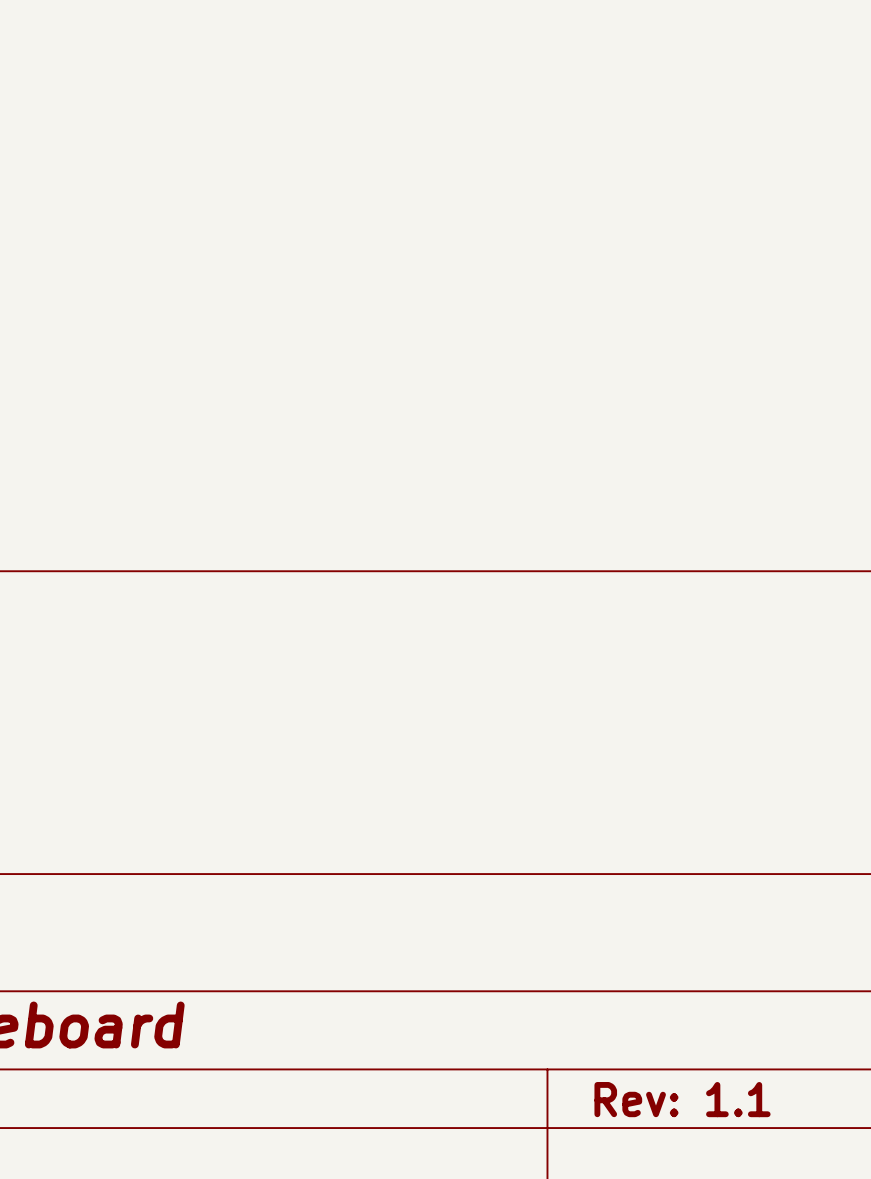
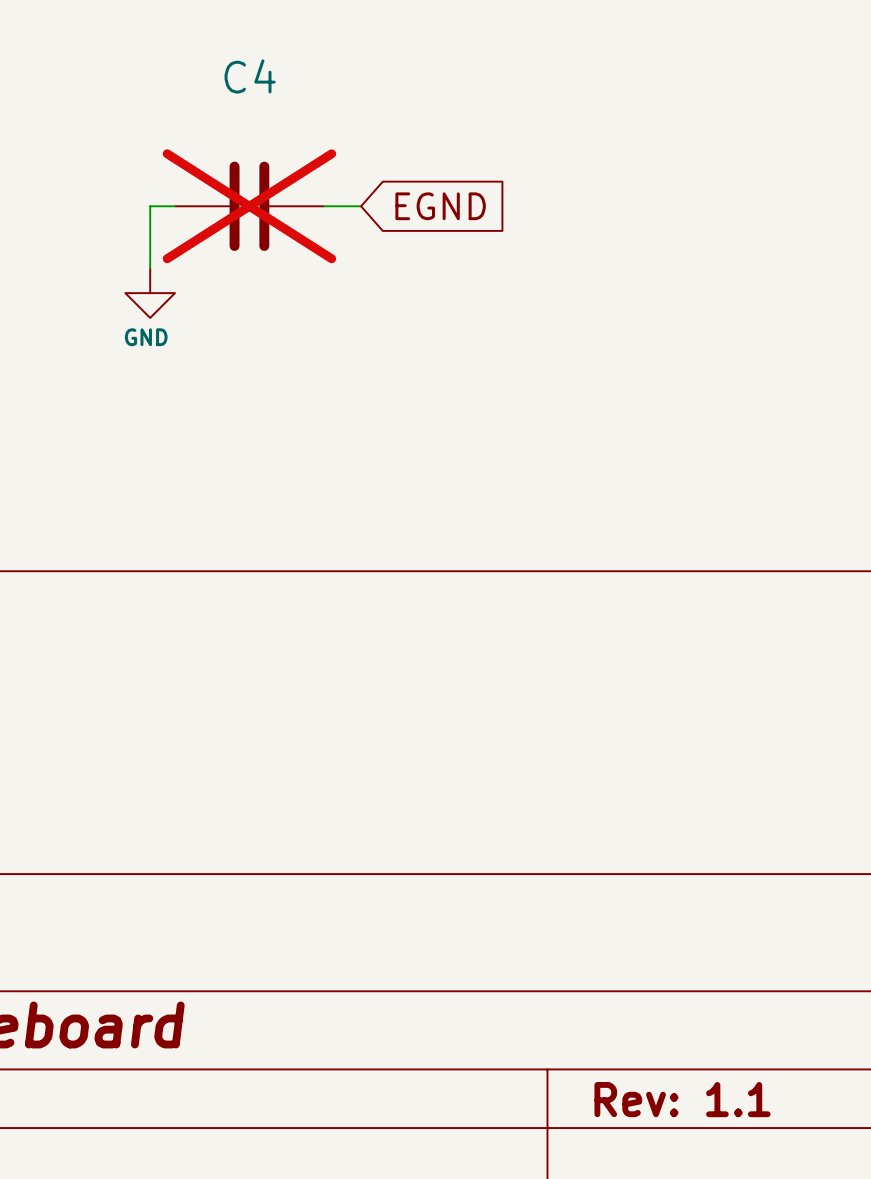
wire: none -> (175, 206) (150, 206) (150, 268)
C4: none -> (249, 206)
wire: none -> (323, 206) (361, 206)
global label: none -> EGND (440, 206)
power symbol: none -> GND (150, 293)

